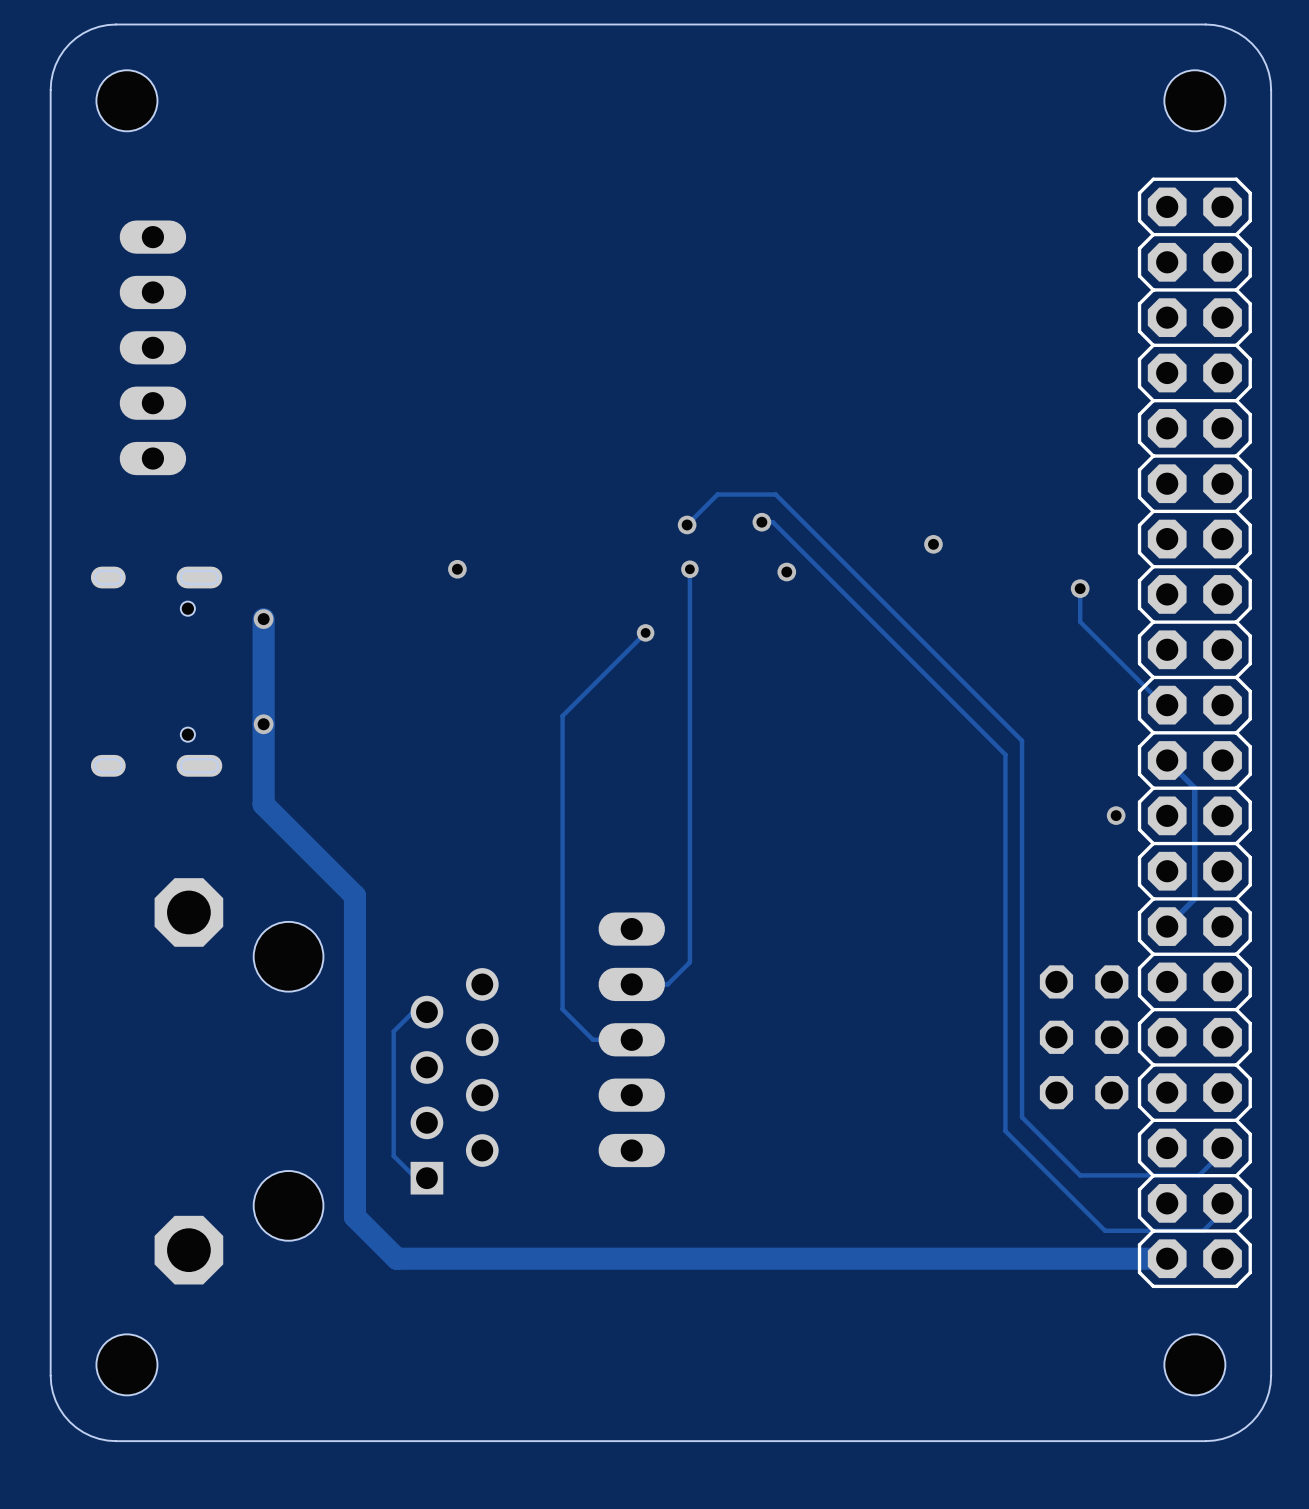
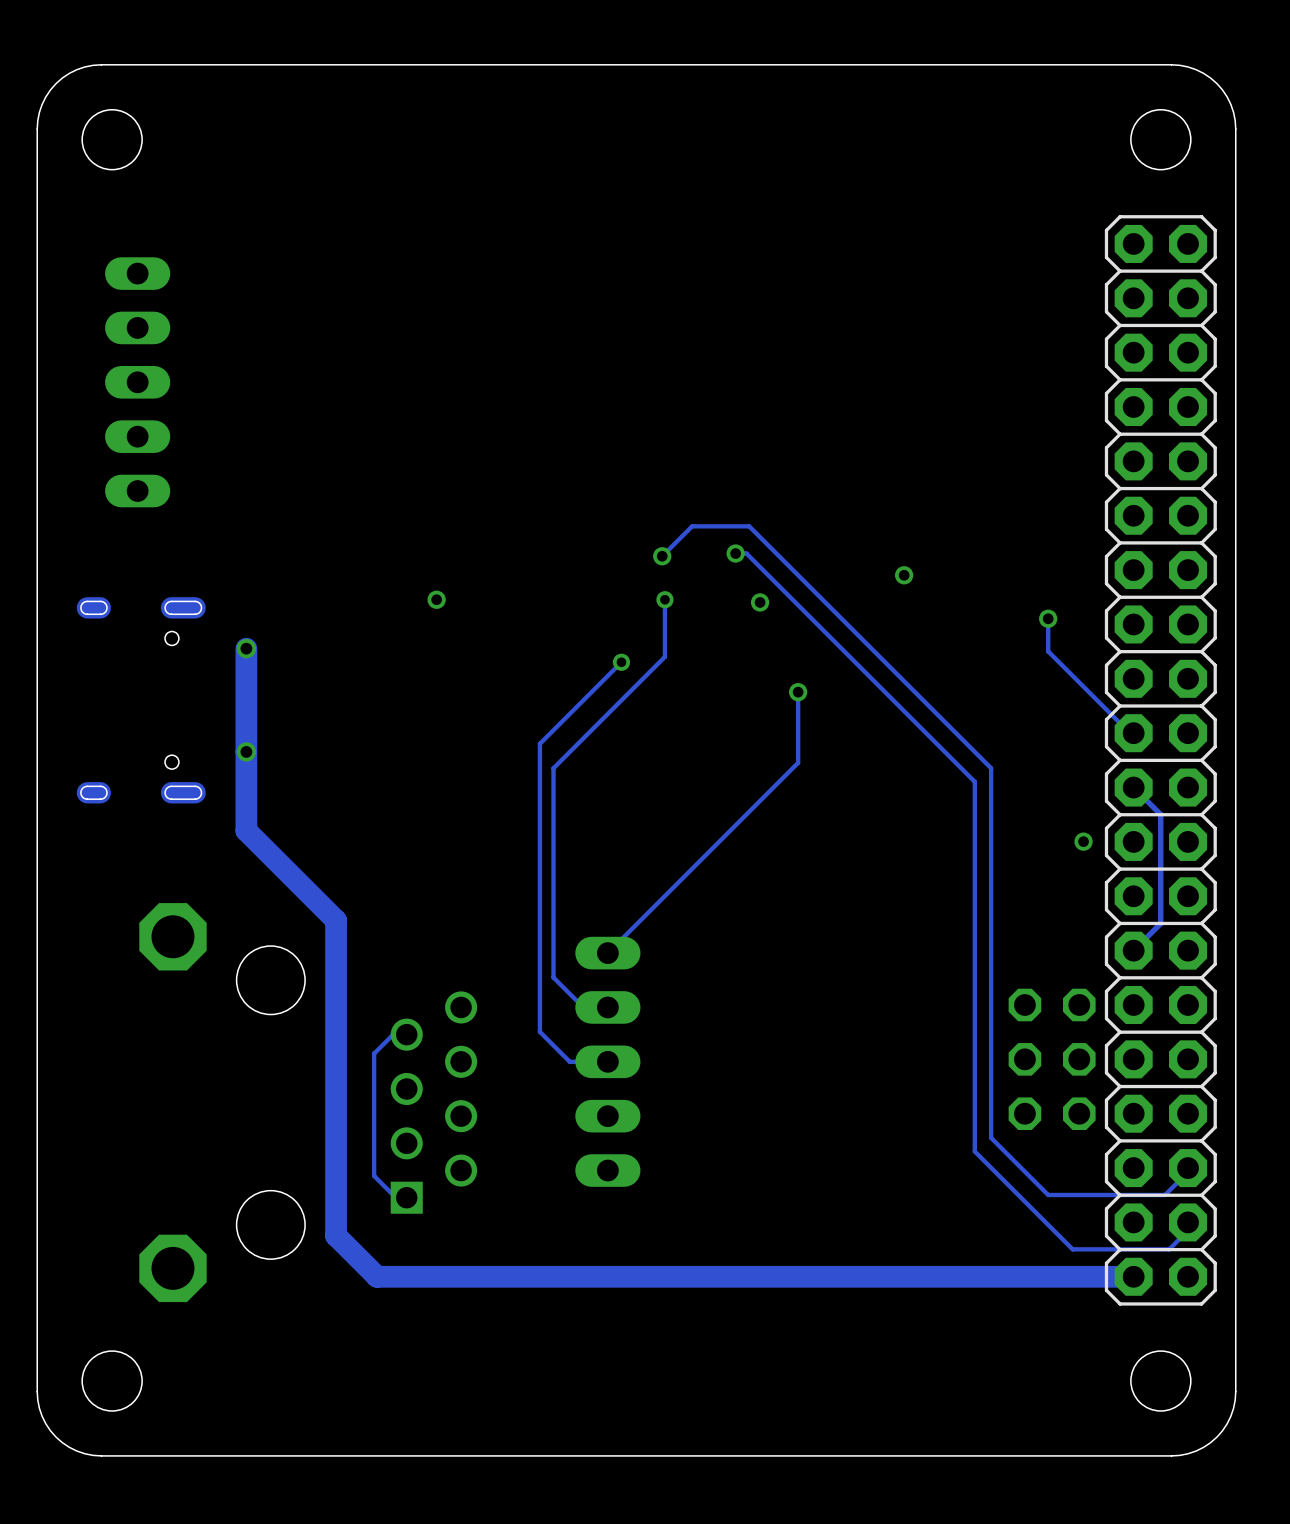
track: (689, 627) (689, 962) (667, 984) (631, 984) -> (664, 656) (553, 768) (553, 977) (583, 1007) (607, 1007)
track: none -> (798, 692) (798, 762) (607, 953)
via: none -> (798, 692)

